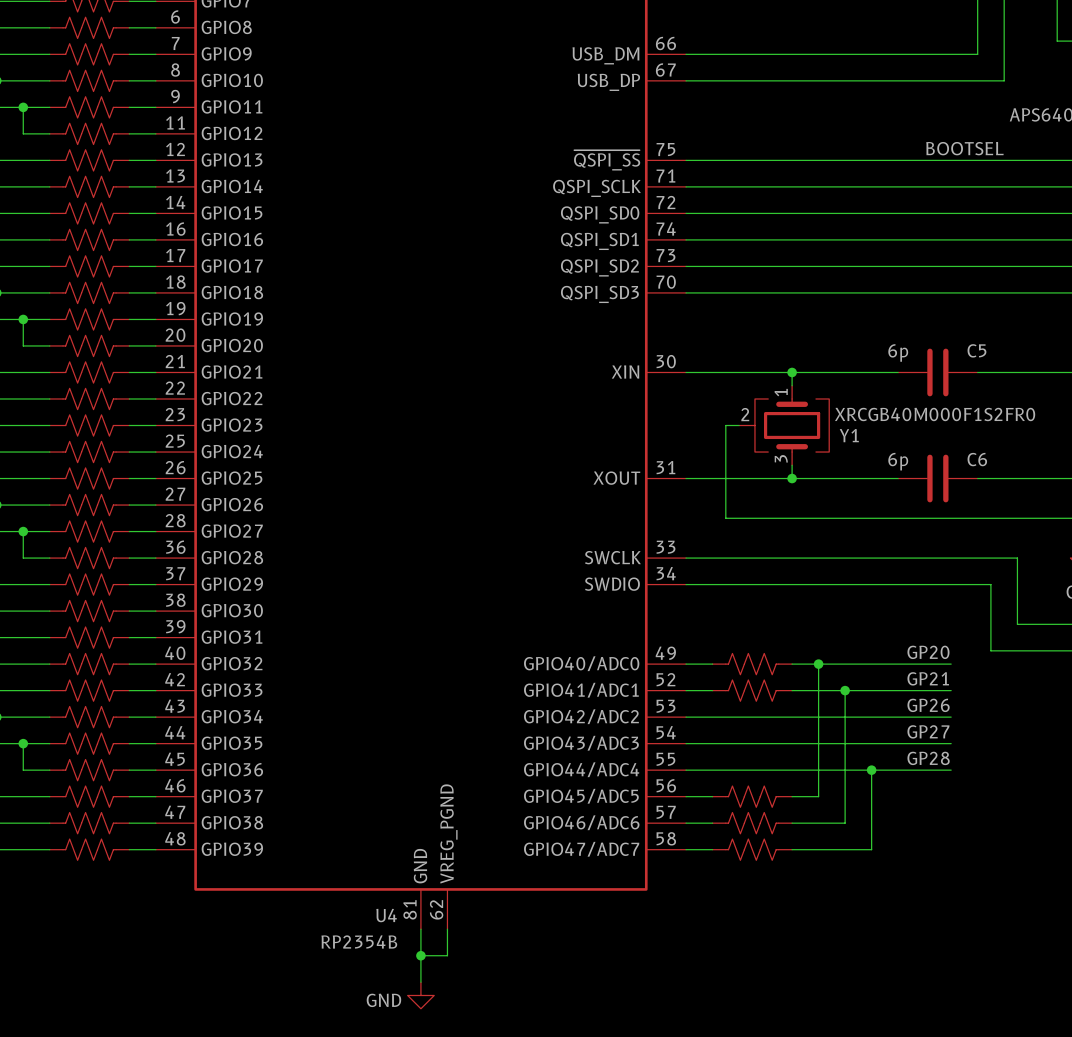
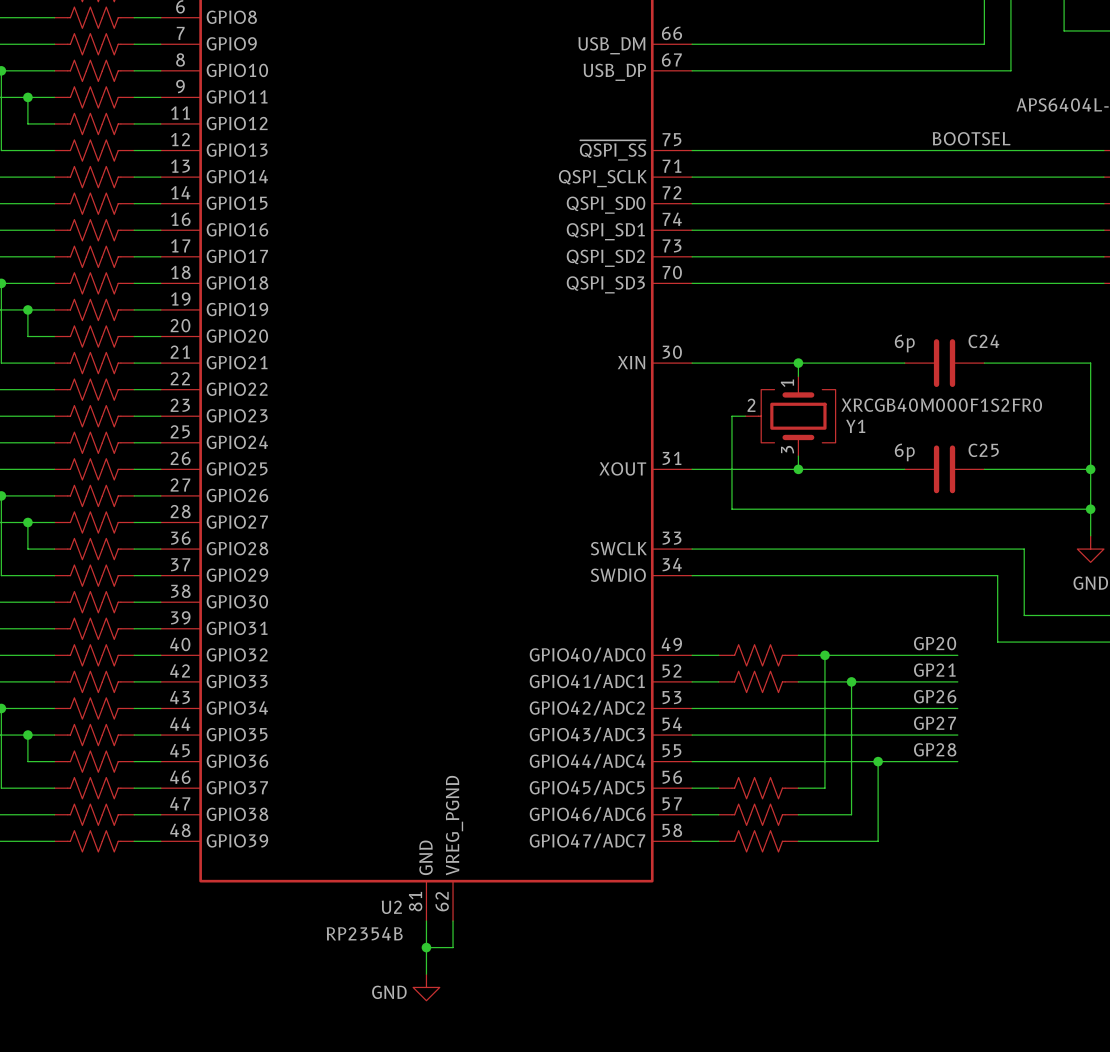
C5 name: C5 (976, 350) -> C24 (983, 341)
C6 name: C6 (977, 459) -> C25 (983, 450)
U4 name: U4 (386, 915) -> U2 (391, 907)

